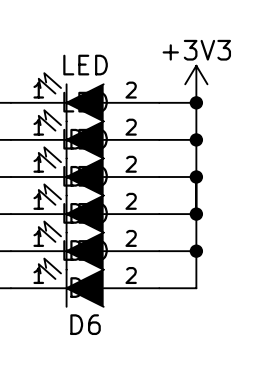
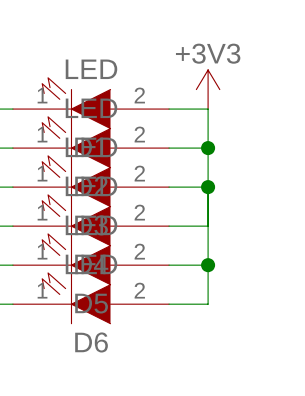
junction: (196, 102) -> none
junction: (196, 214) -> none

